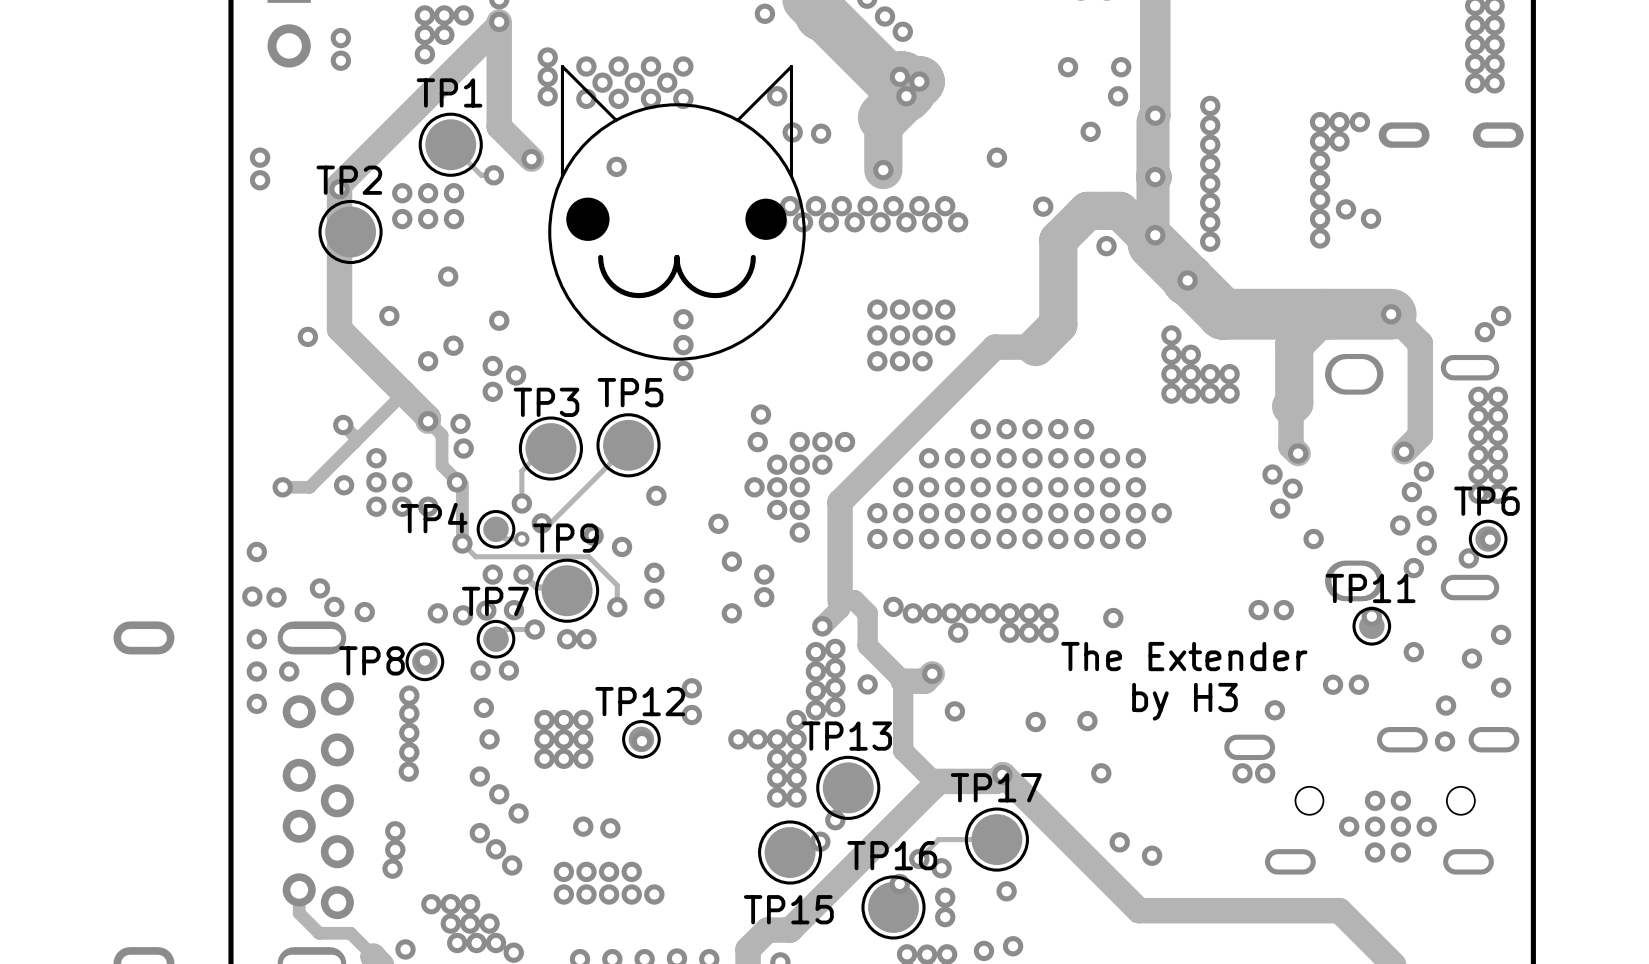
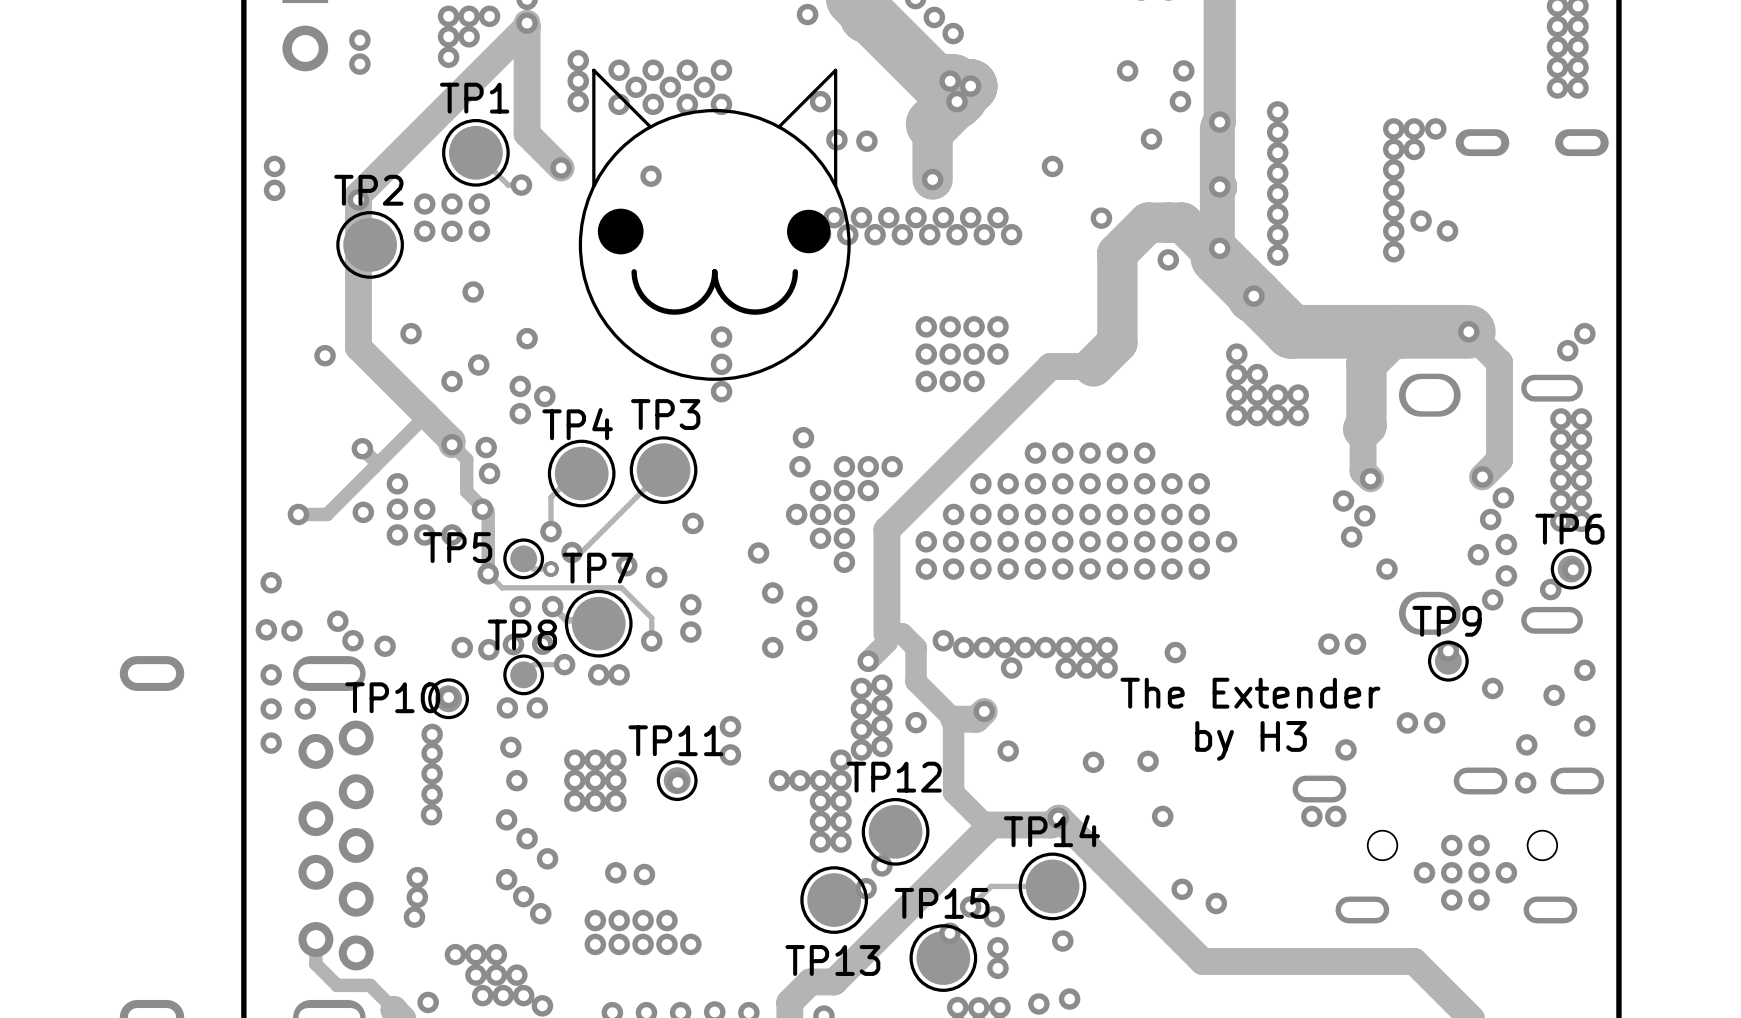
TP5 name: TP5 (630, 392) -> TP3 (665, 414)
TP3 name: TP3 (546, 402) -> TP4 (577, 424)
TP4 name: TP4 (433, 518) -> TP5 (457, 547)
TP9 name: TP9 (565, 538) -> TP7 (598, 568)
TP11 name: TP11 (1370, 588) -> TP9 (1447, 621)
TP7 name: TP7 (495, 601) -> TP8 (522, 634)
TP8 name: TP8 (371, 660) -> TP10 (392, 697)
TP12 name: TP12 (640, 701) -> TP11 (675, 740)
TP13 name: TP13 (847, 736) -> TP12 (894, 777)
TP17 name: TP17 (996, 787) -> TP14 (1051, 831)
TP16 name: TP16 (892, 855) -> TP15 (942, 903)
TP15 name: TP15 (788, 909) -> TP13 (832, 960)

